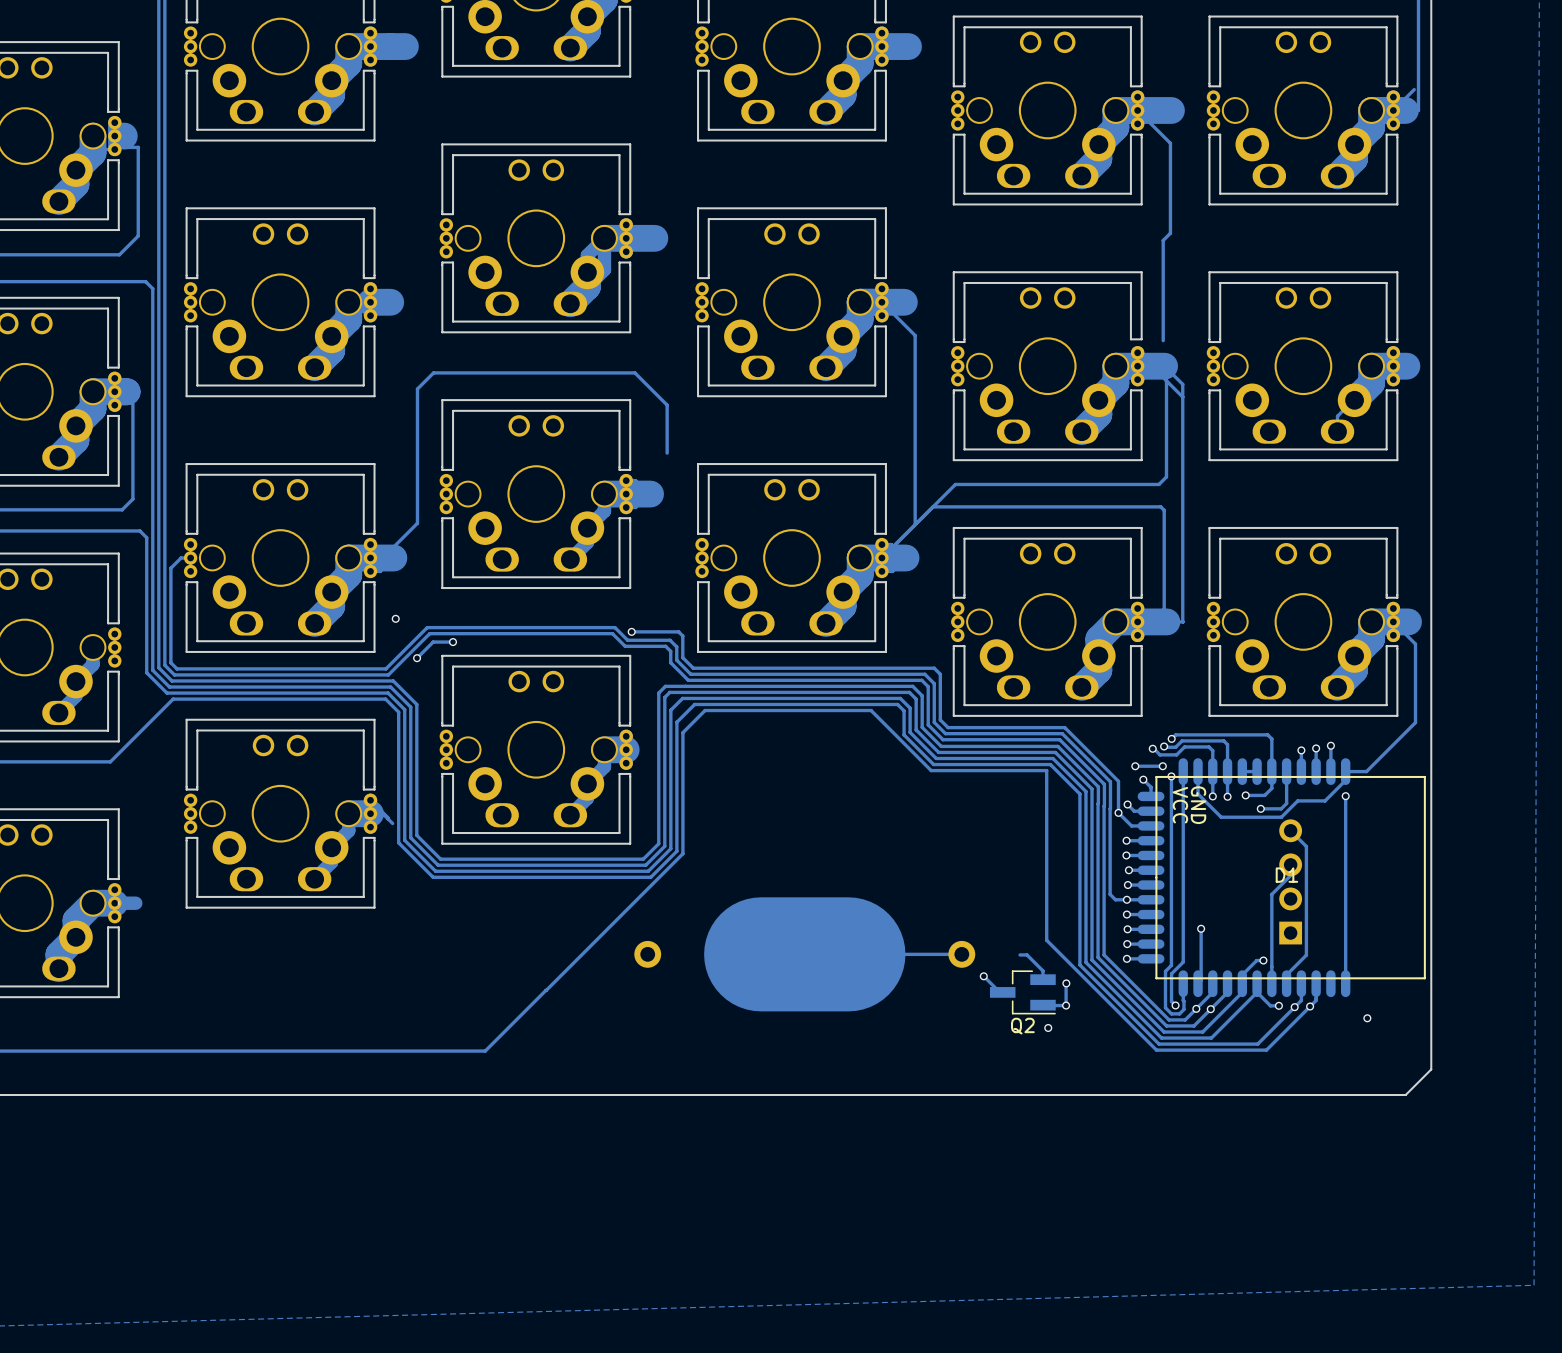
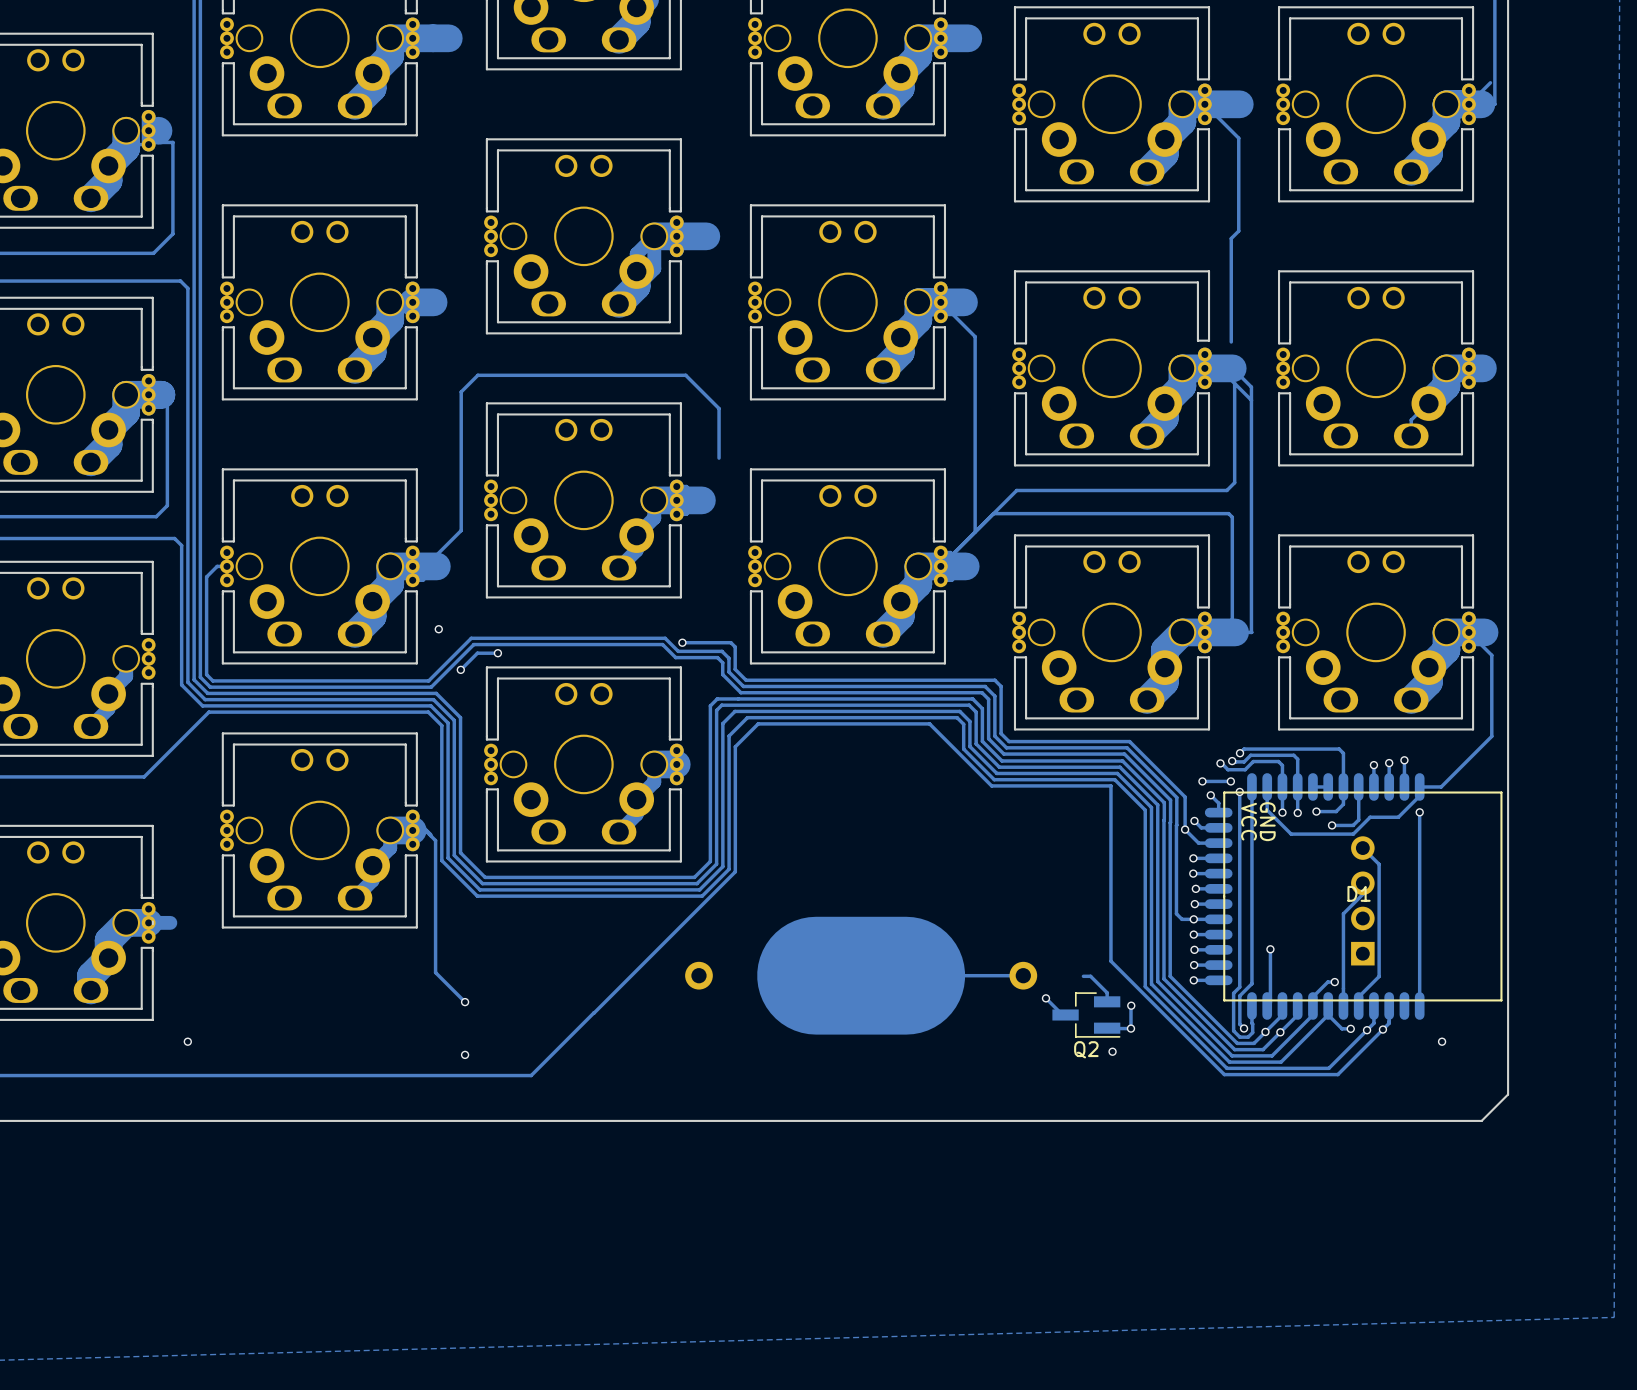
track: none -> (435, 840) (435, 972) (465, 1002)
via: none -> (465, 1002)
via: none -> (187, 1041)
via: none -> (465, 1054)

